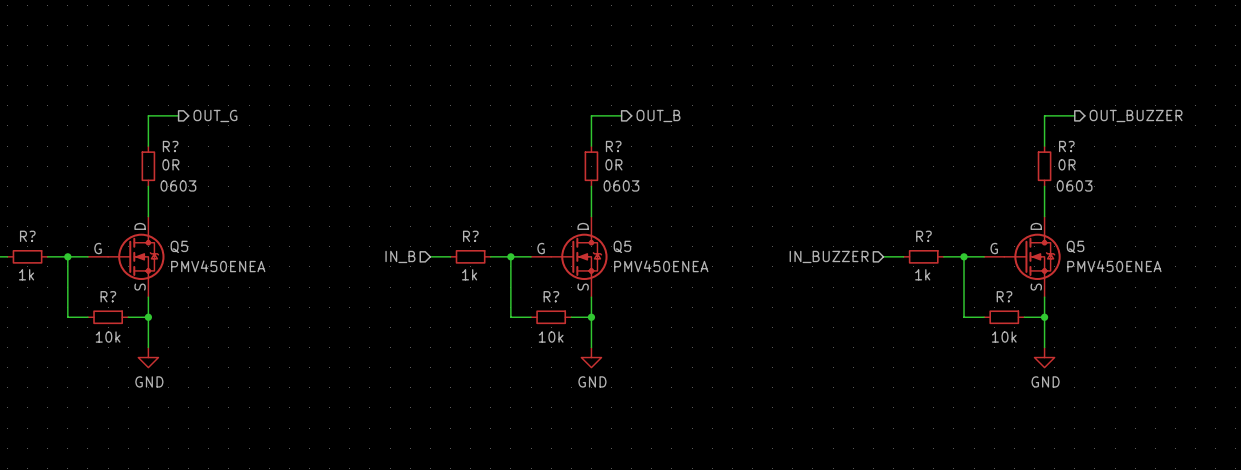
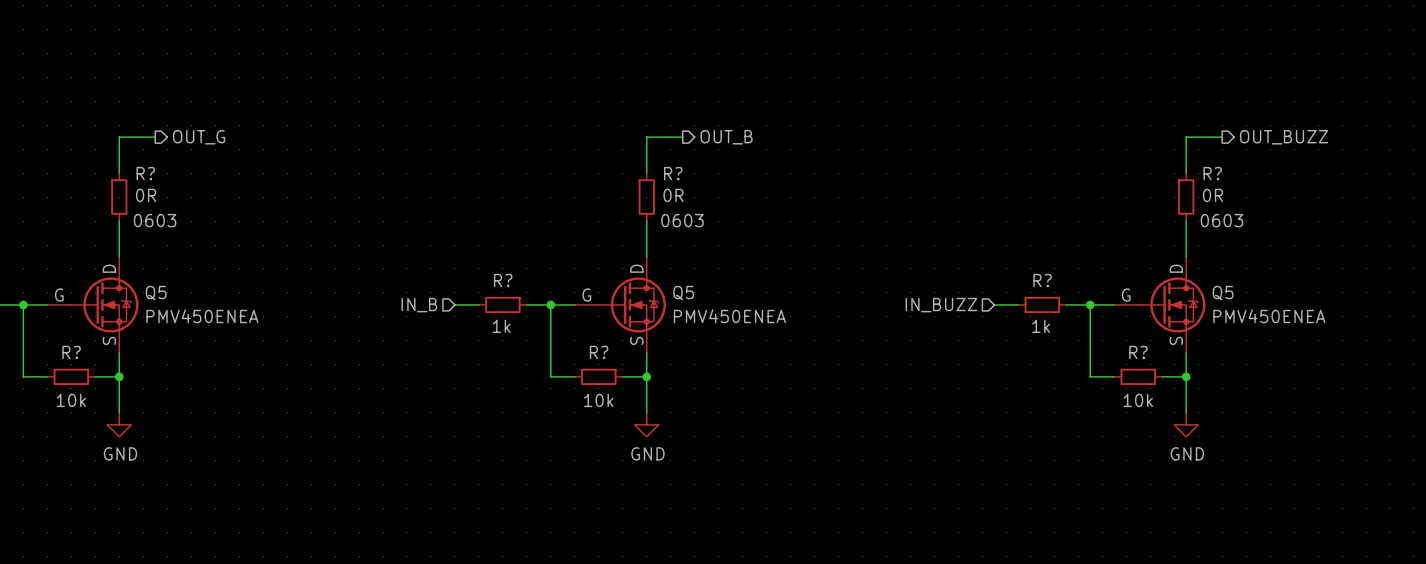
hierarchical label: OUT_BUZZER (1136, 115) -> OUT_BUZZ (1284, 137)
hierarchical label: IN_BUZZER (829, 256) -> IN_BUZZ (941, 305)

